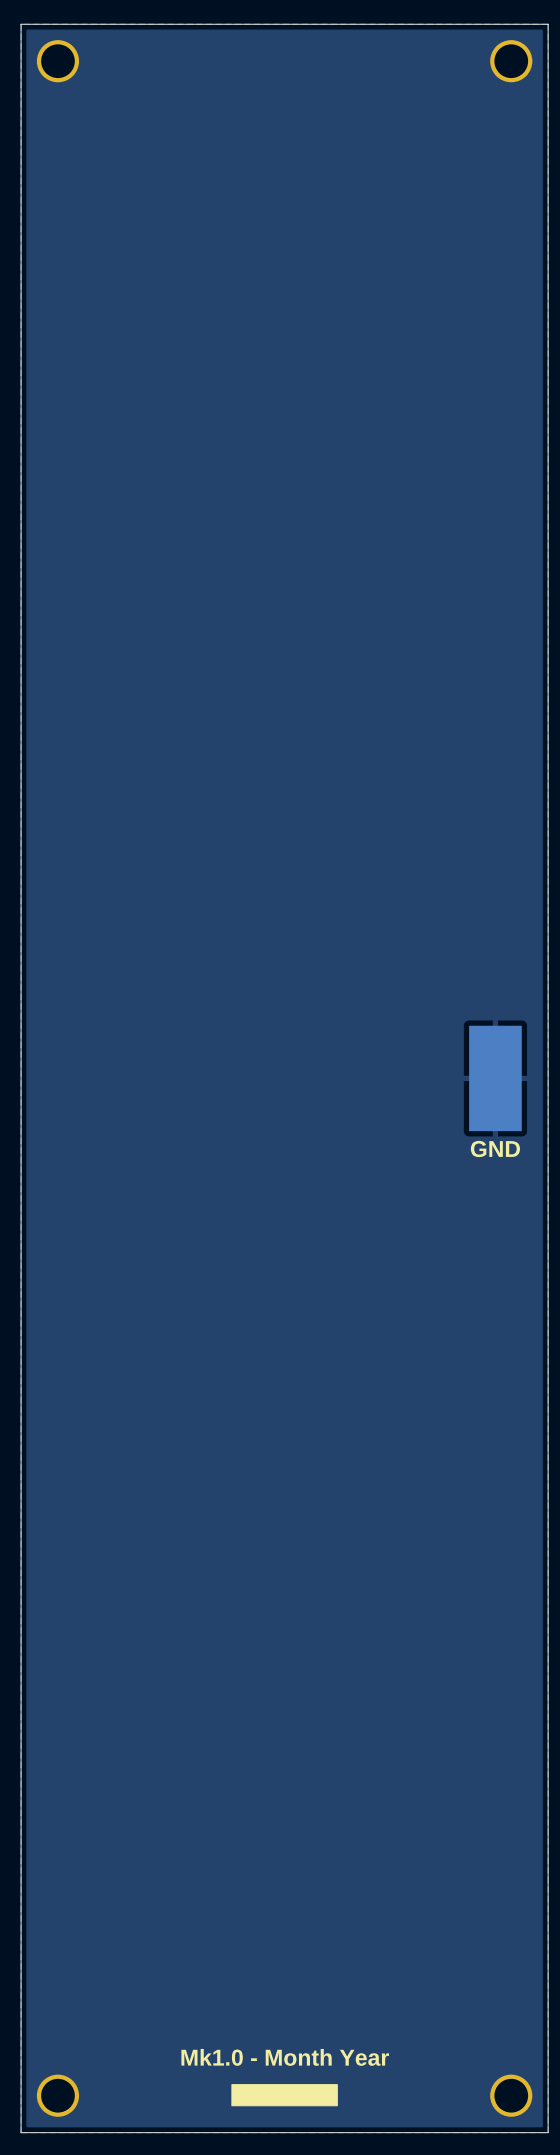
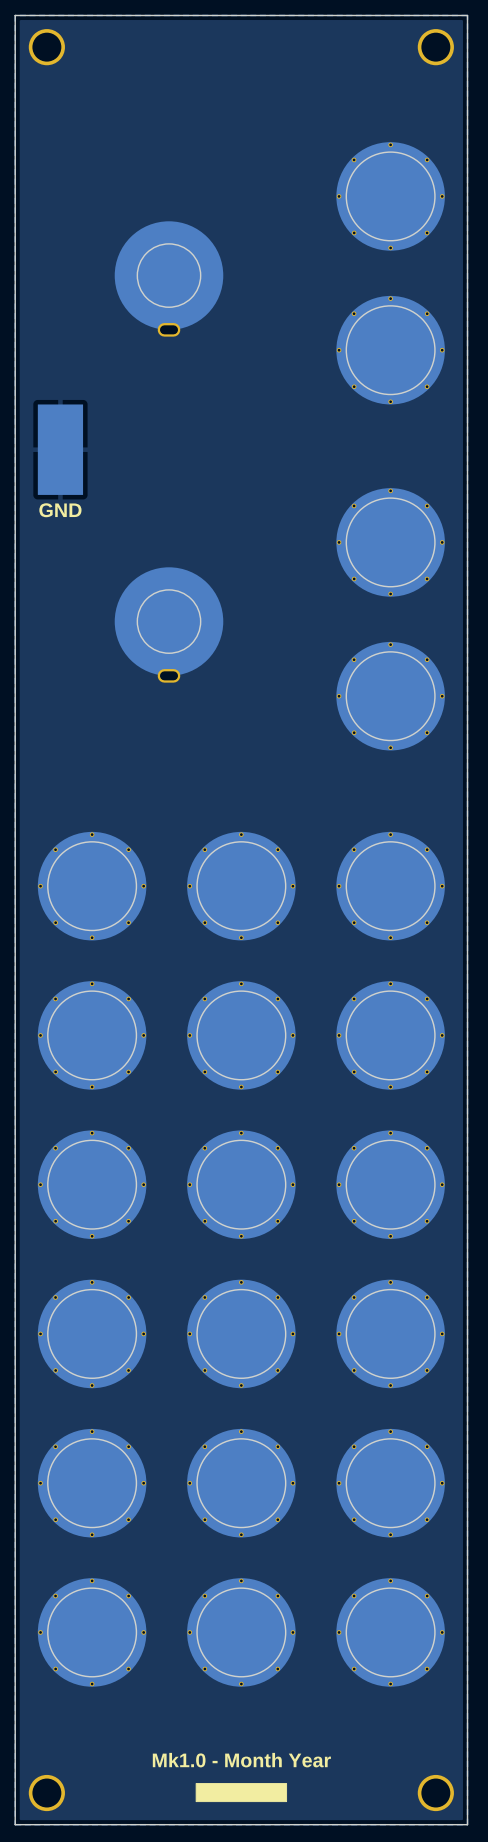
part: none -> (390, 196)
part: none -> (169, 278)
part: none -> (390, 350)
part: none -> (60, 449)
part: none -> (390, 542)
part: none -> (169, 624)
part: none -> (390, 696)
part: none -> (92, 886)
part: none -> (241, 886)
part: none -> (390, 886)
part: (495, 1078) -> none
part: none -> (92, 1035)
part: none -> (241, 1035)
part: none -> (390, 1035)
part: none -> (92, 1184)
part: none -> (241, 1184)
part: none -> (390, 1184)
part: none -> (92, 1333)
part: none -> (241, 1333)
part: none -> (390, 1333)
part: none -> (92, 1483)
part: none -> (241, 1483)
part: none -> (390, 1483)
part: none -> (92, 1632)
part: none -> (241, 1632)
part: none -> (390, 1632)

